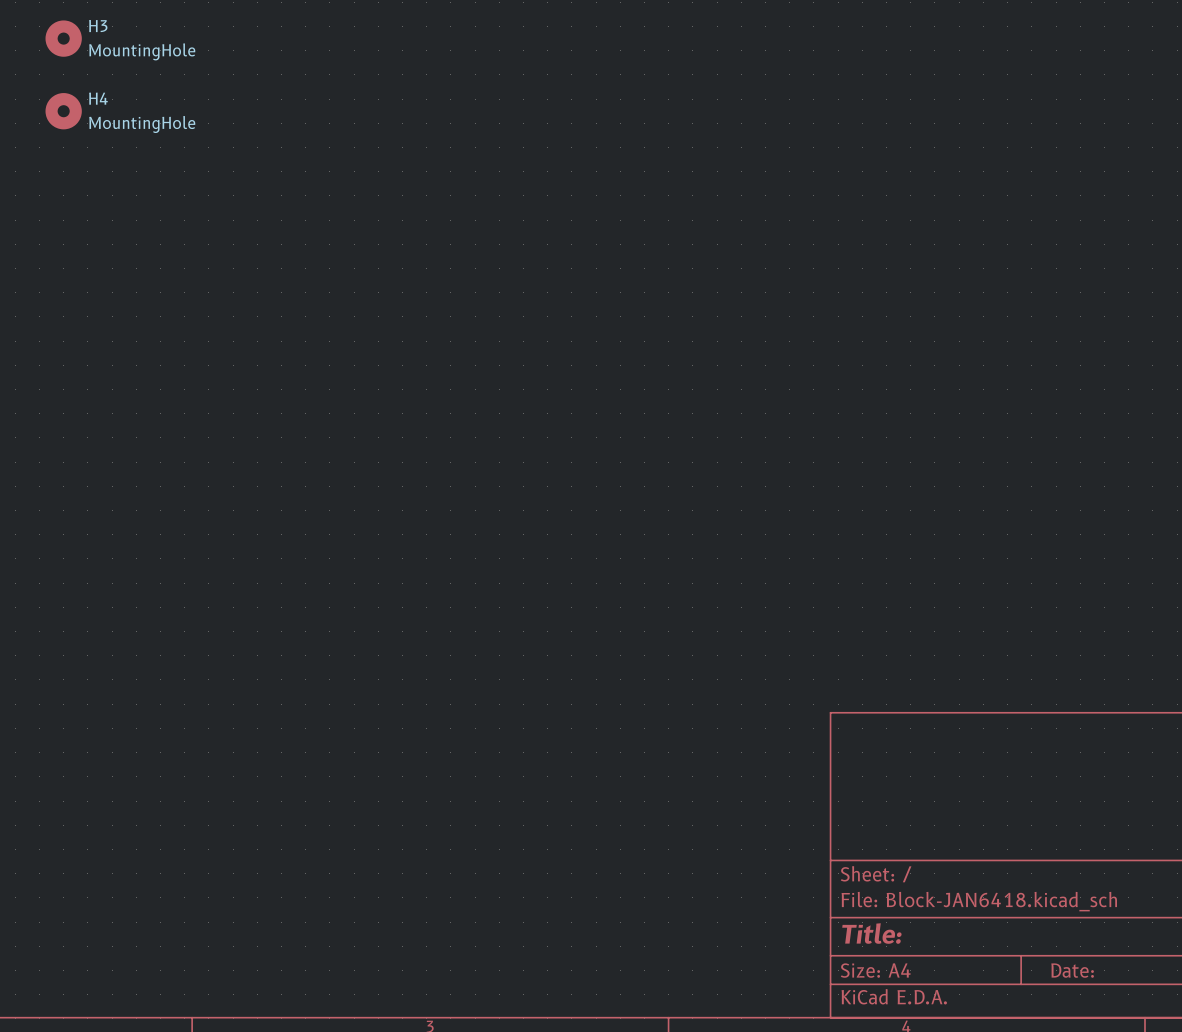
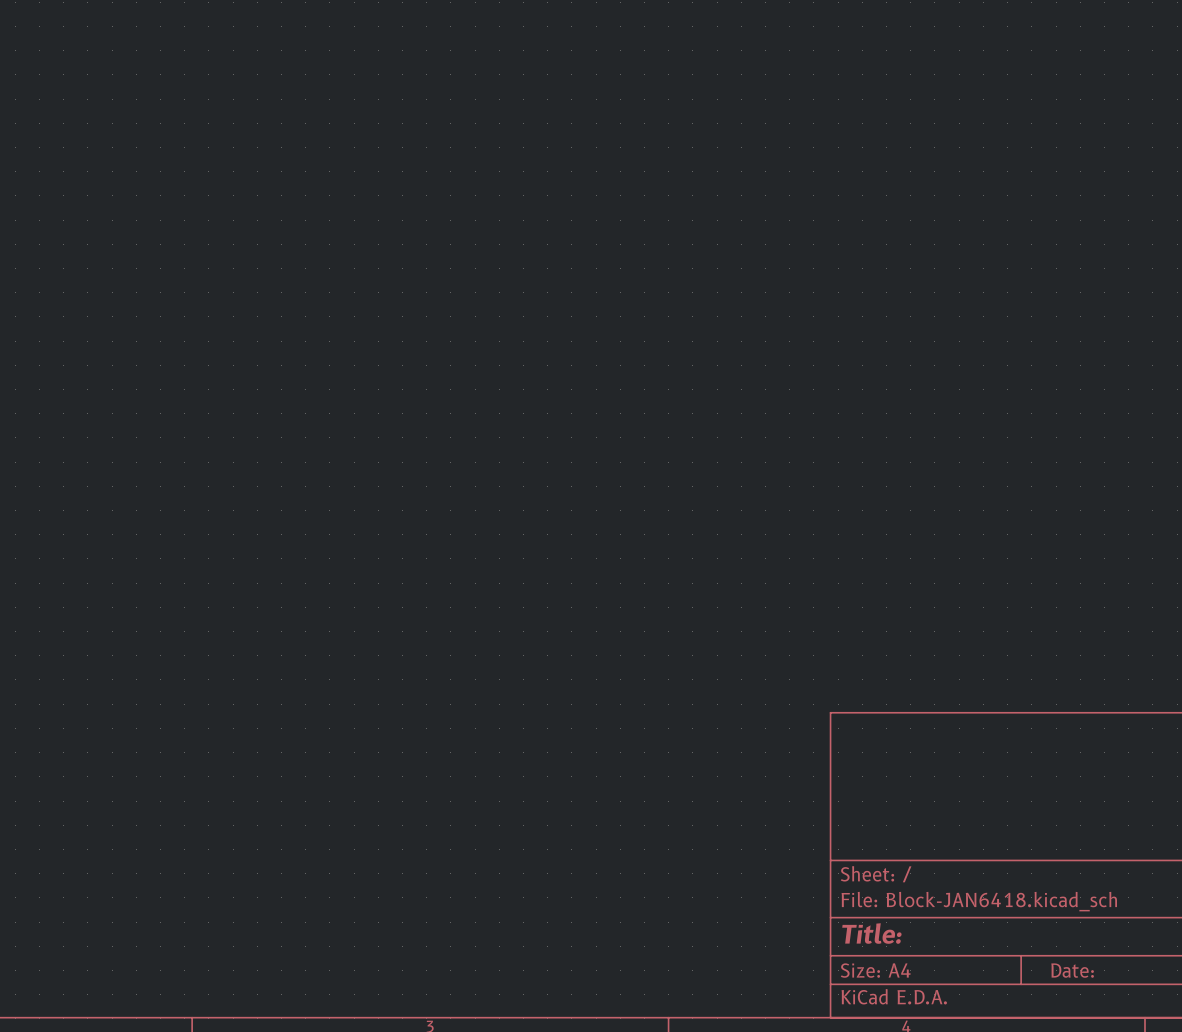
H3: MountingHole (63, 38) -> none
H4: MountingHole (63, 111) -> none

